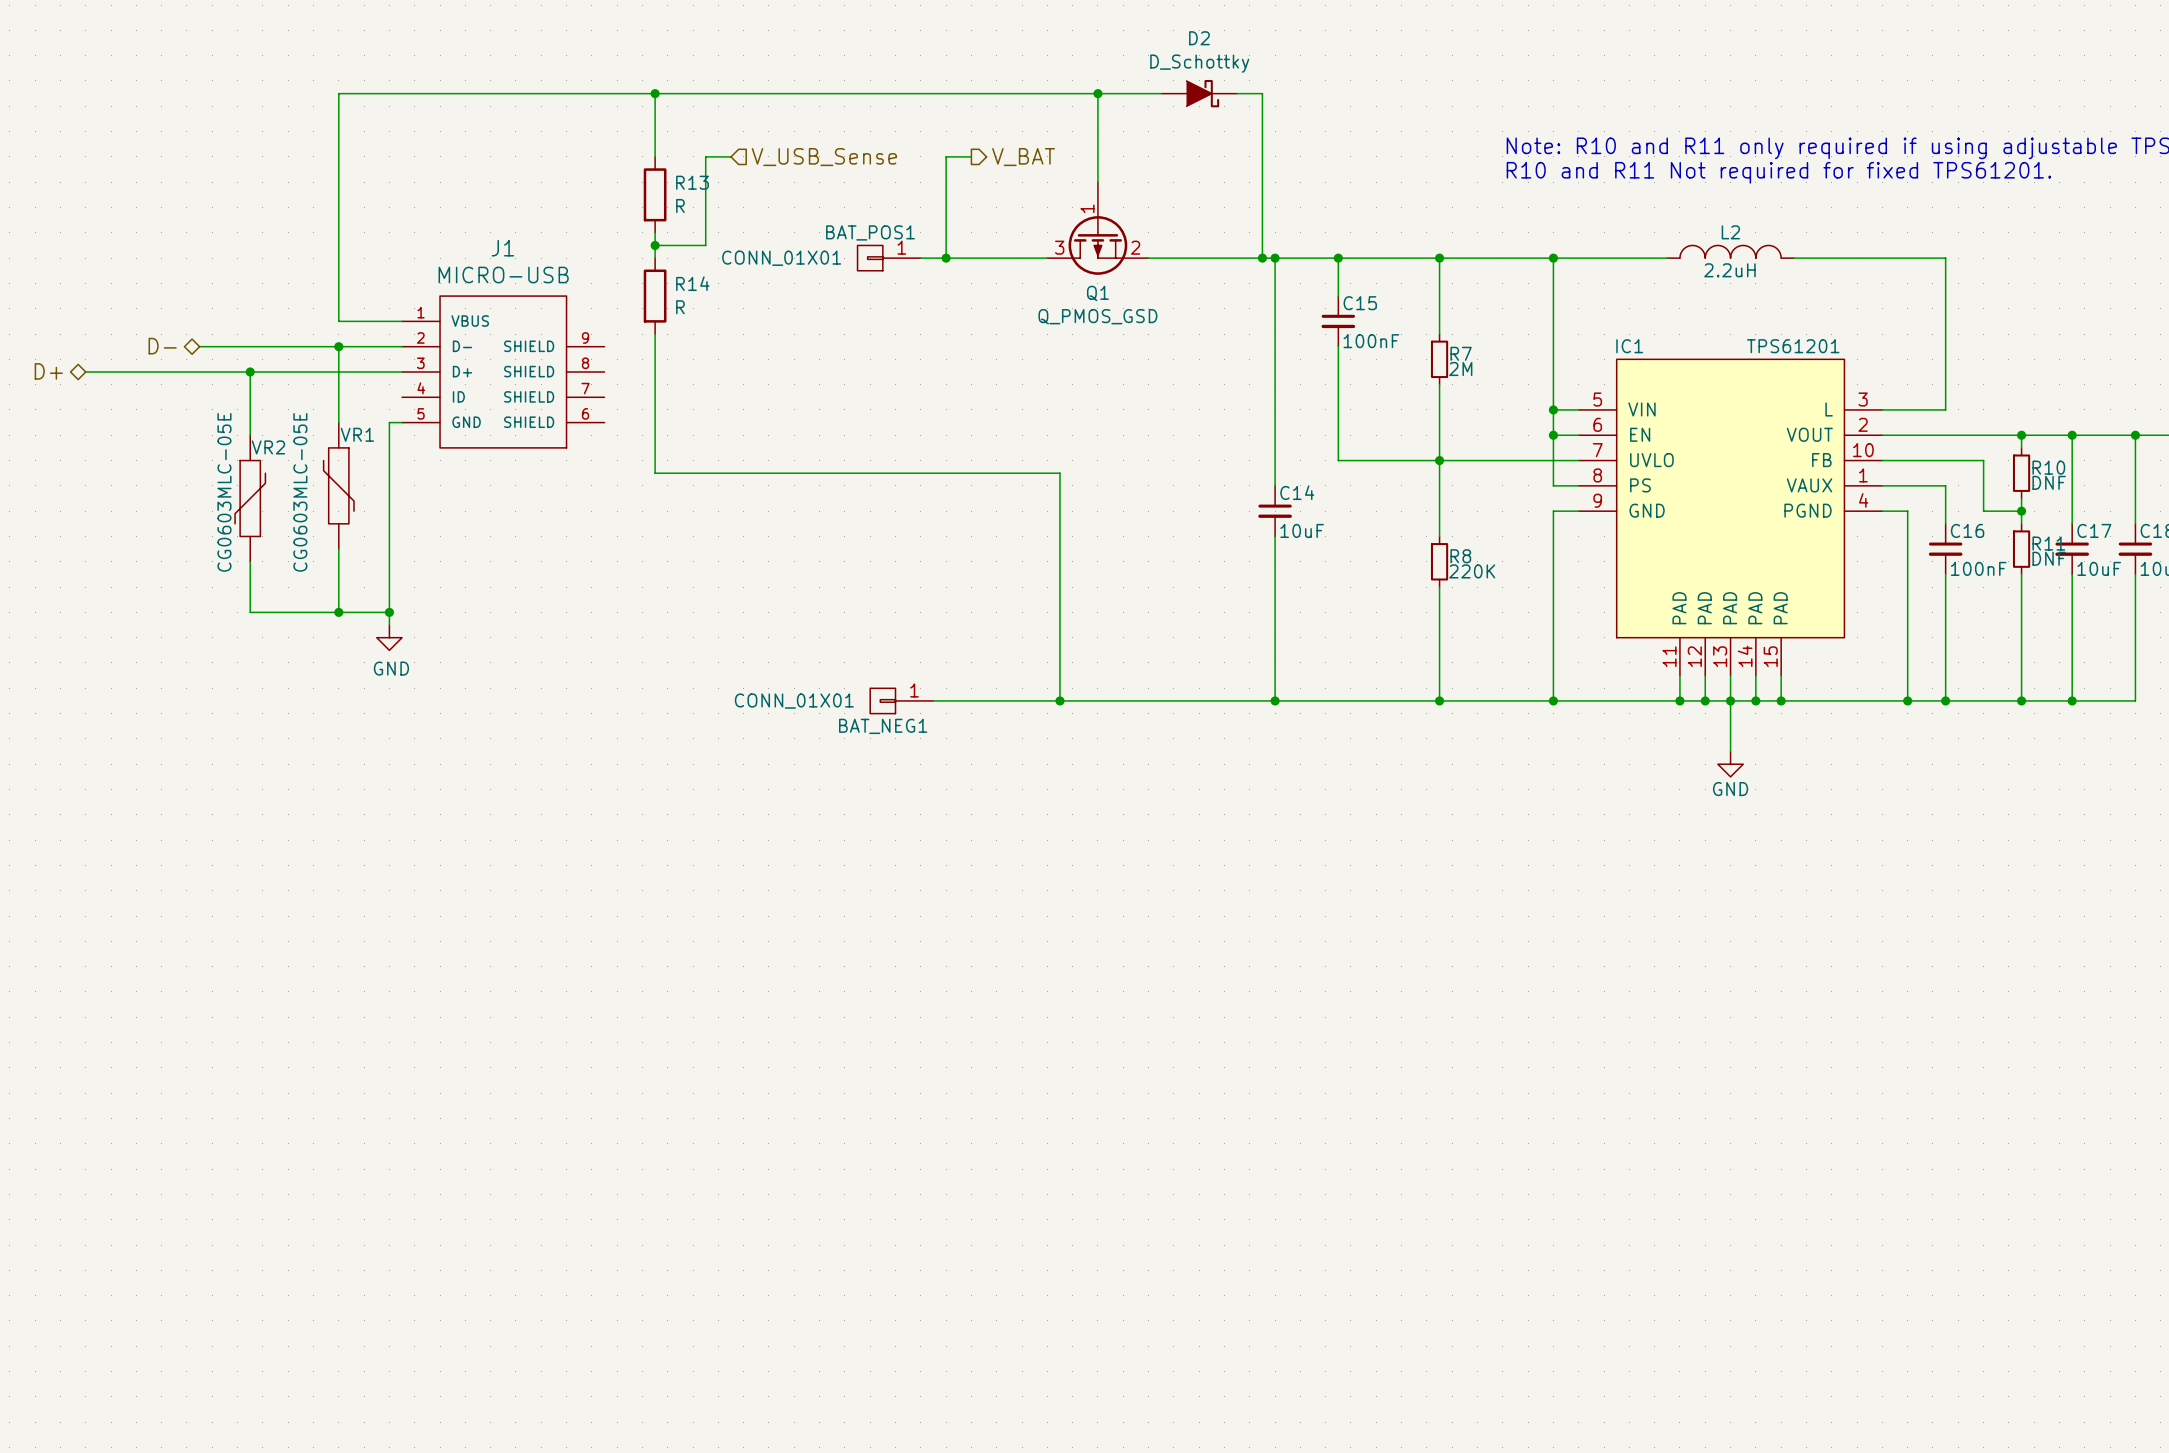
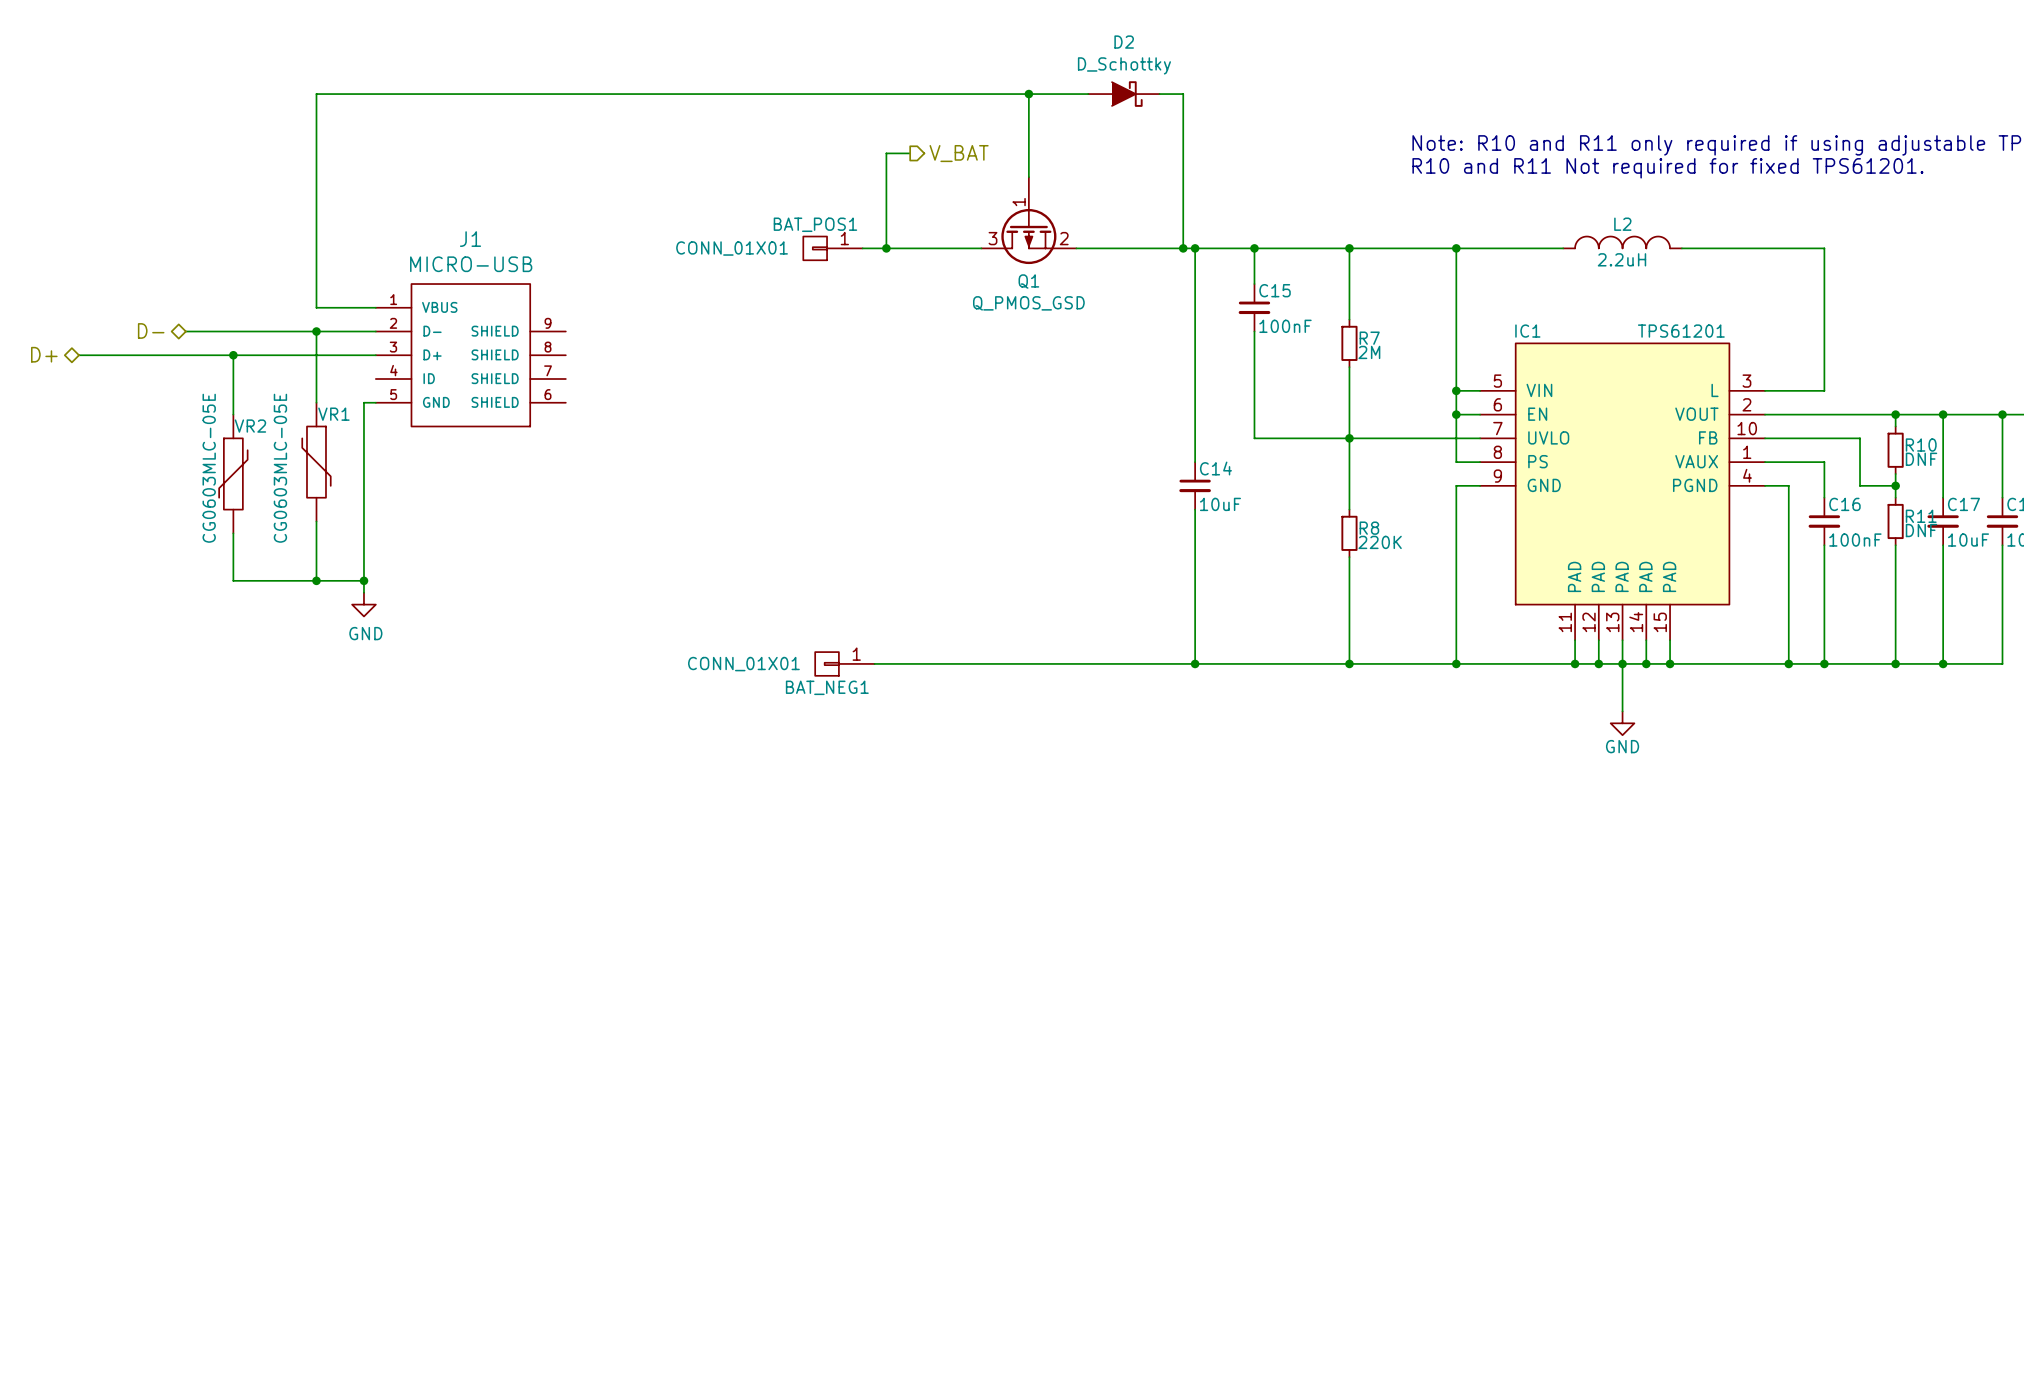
wire: (655, 93) (655, 156) -> none
junction: (655, 93) -> none
wire: (731, 156) (705, 156) (705, 245) (655, 245) -> none
hierarchical label: V_USB_Sense (824, 157) -> none
R13: R (655, 194) -> none
wire: (655, 232) (655, 258) -> none
junction: (655, 245) -> none
R14: R (655, 296) -> none
wire: (655, 334) (655, 473) (1059, 473) (1059, 700) -> none
junction: (1059, 700) -> none

